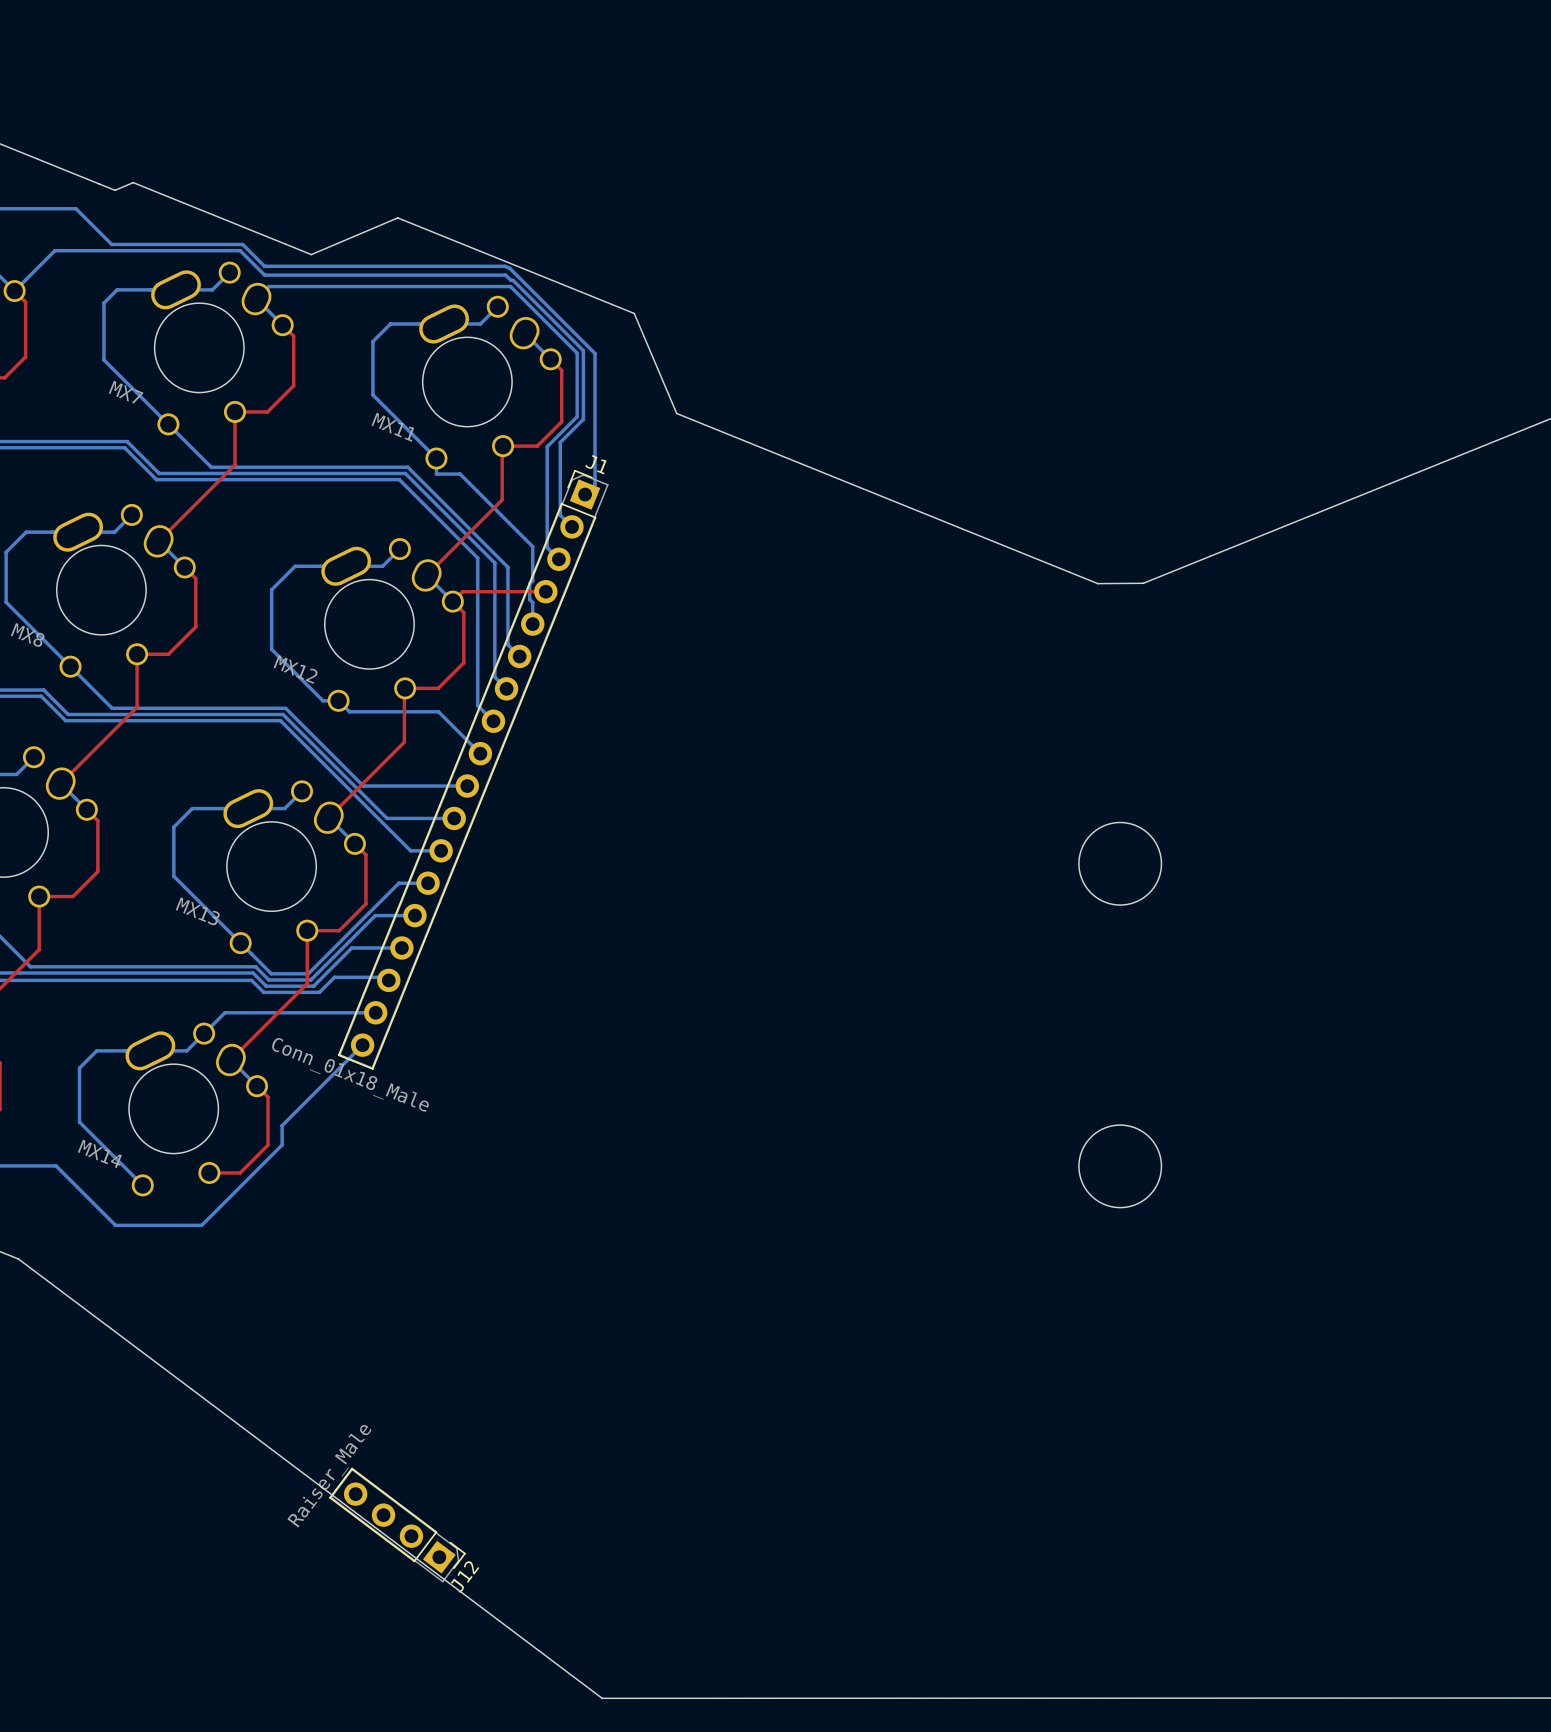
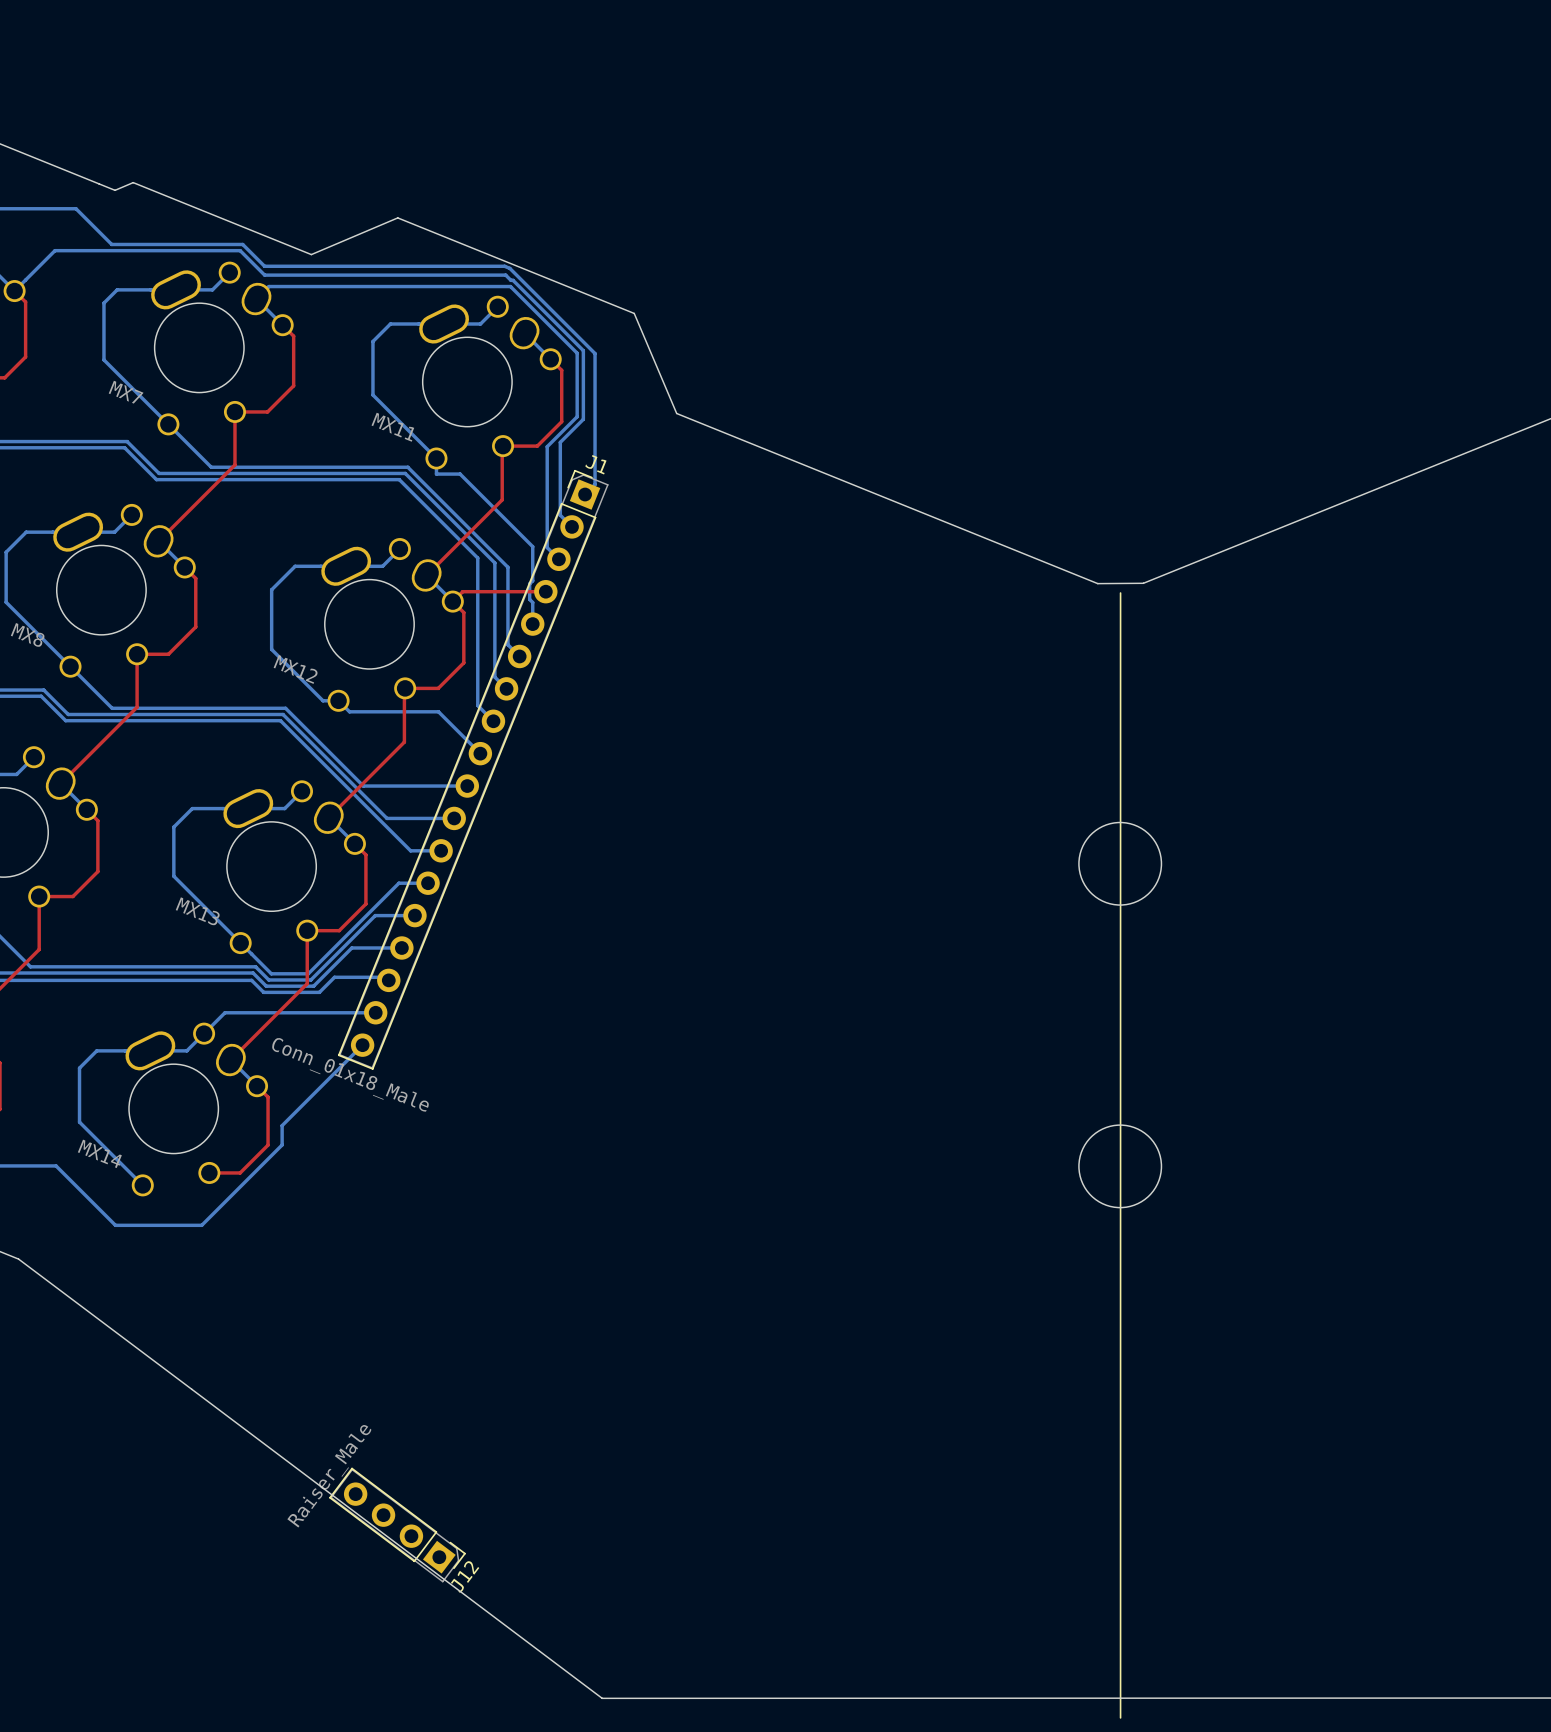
line: none -> (1120, 593) (1120, 1717)

